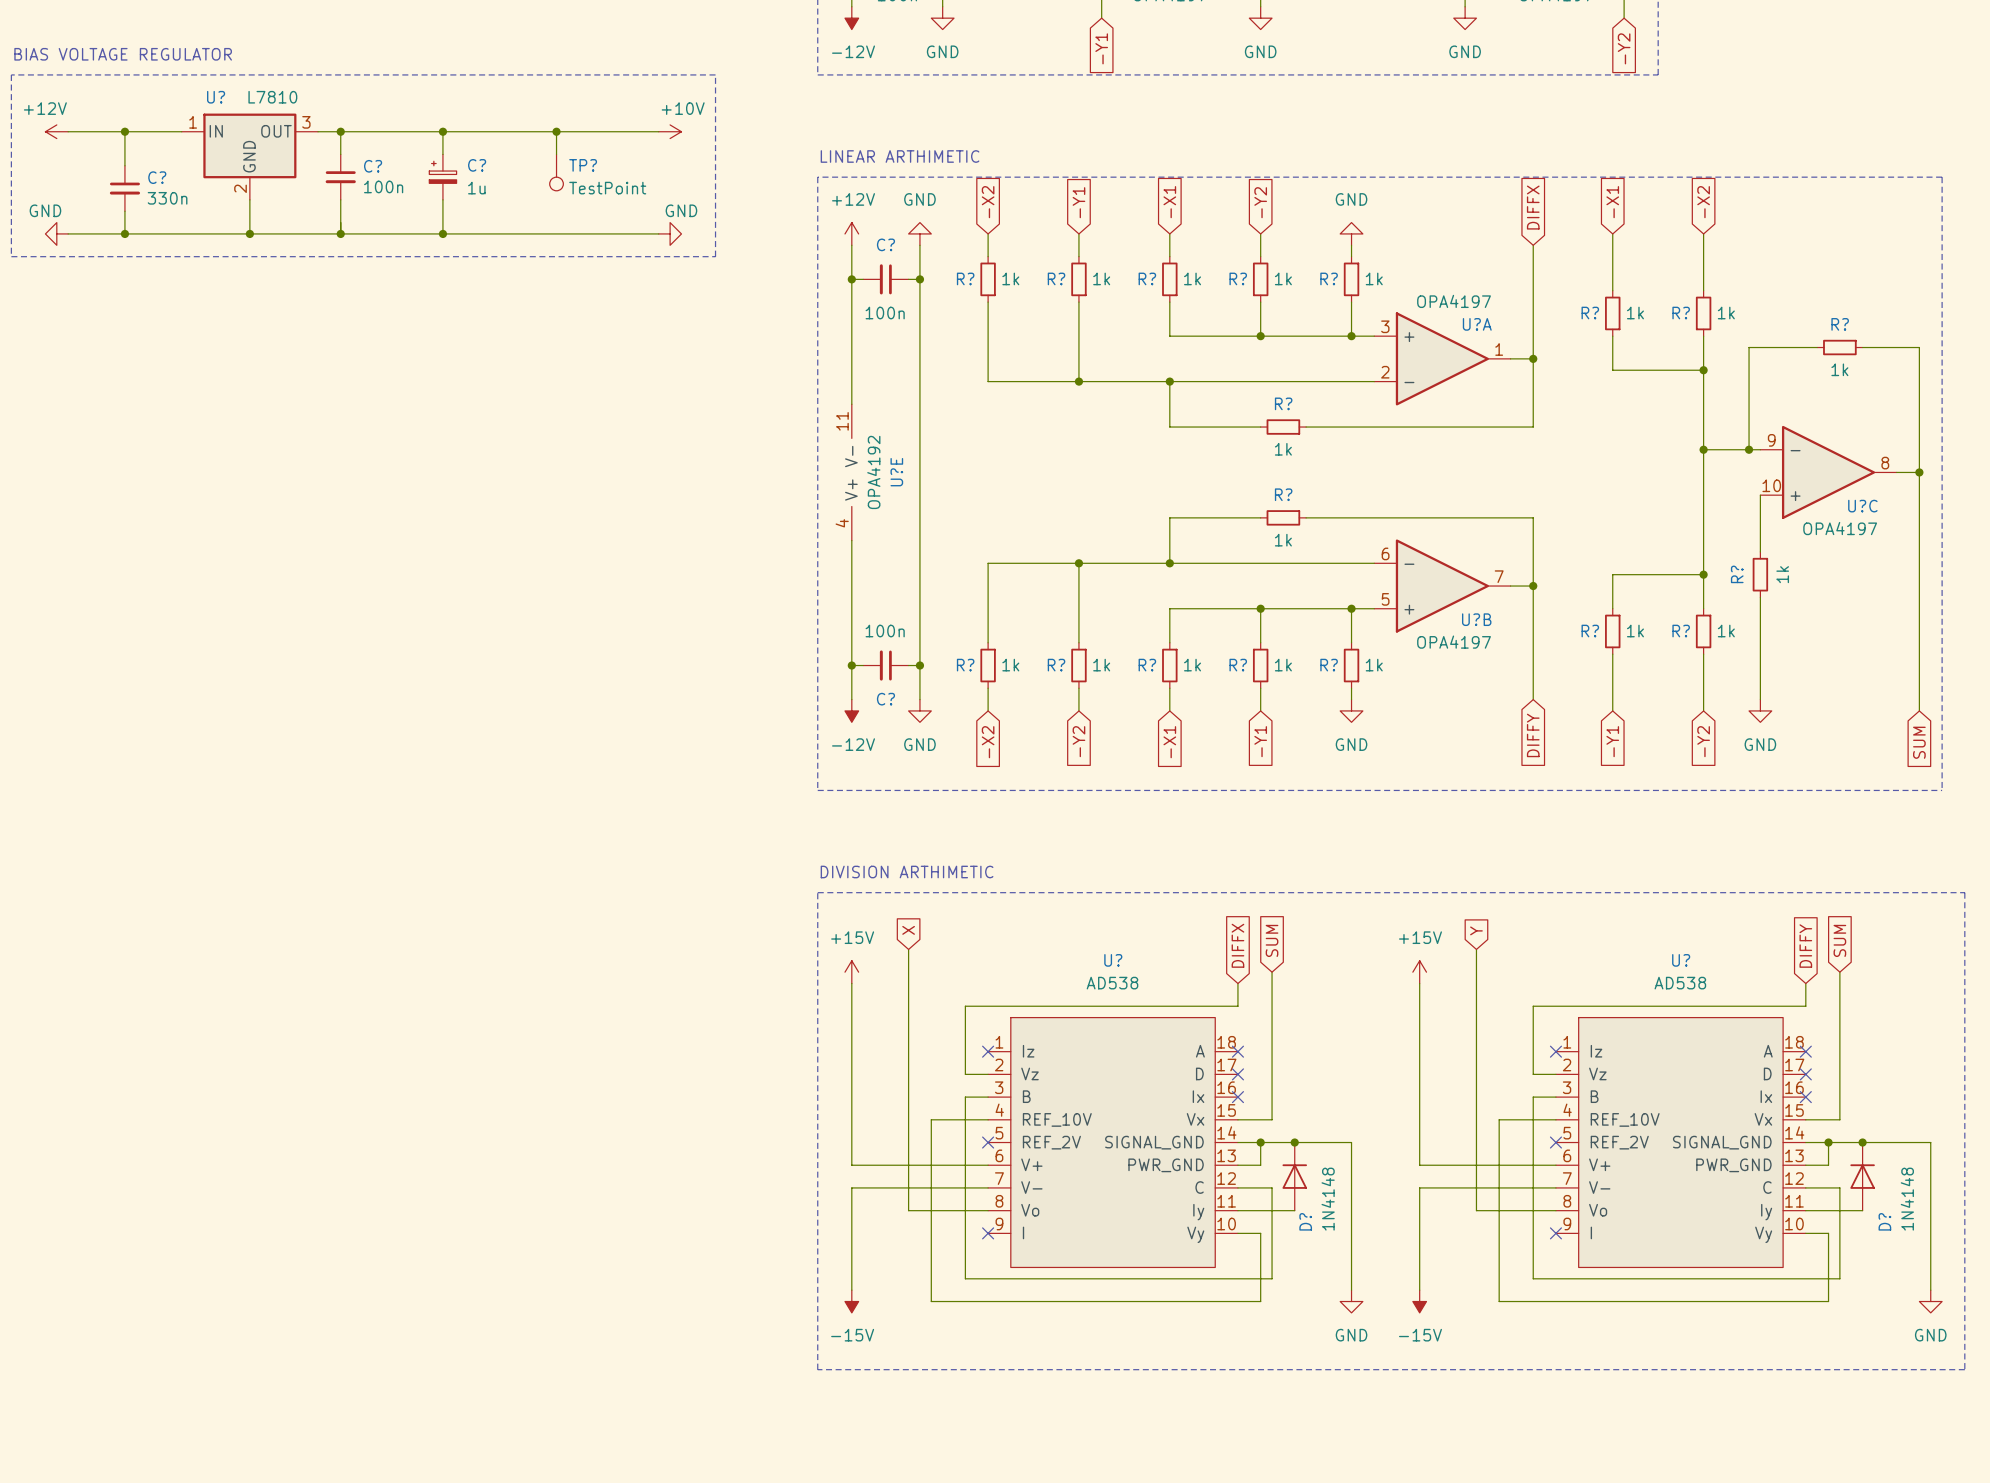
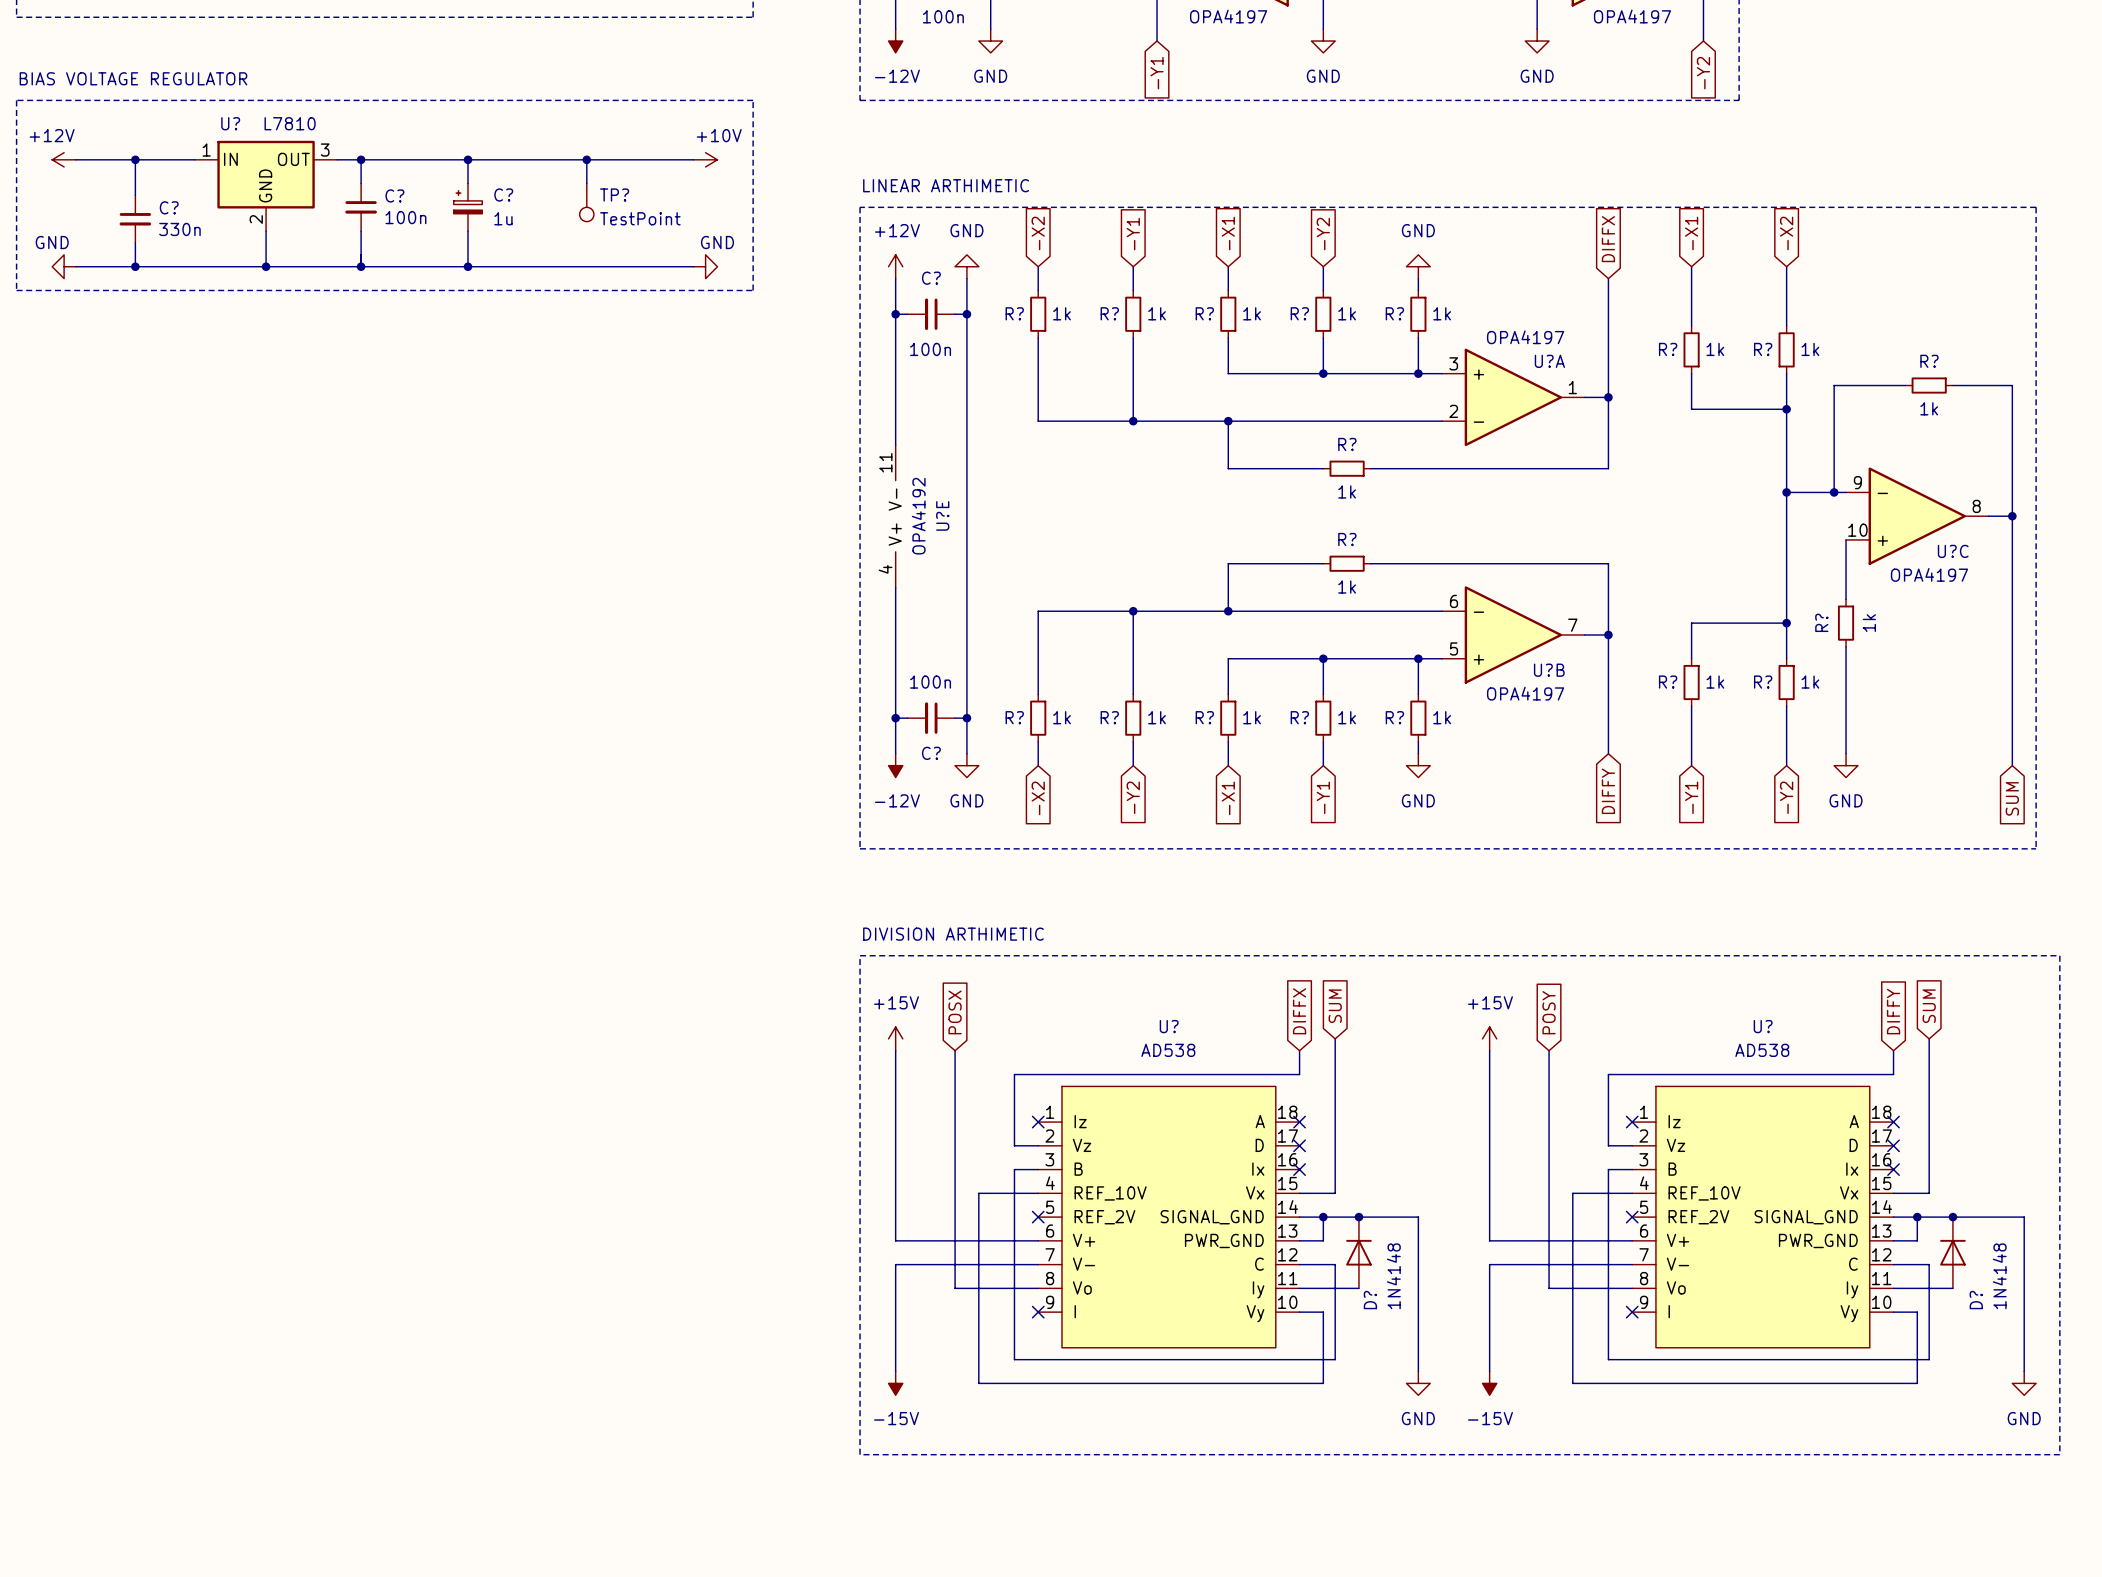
global label: X (908, 930) -> none
global label: Y (1476, 930) -> none
global label: none -> POSX (955, 1012)
global label: none -> POSY (1549, 1012)
wire: (908, 949) (908, 983) -> none
wire: (1476, 949) (1476, 983) -> none

